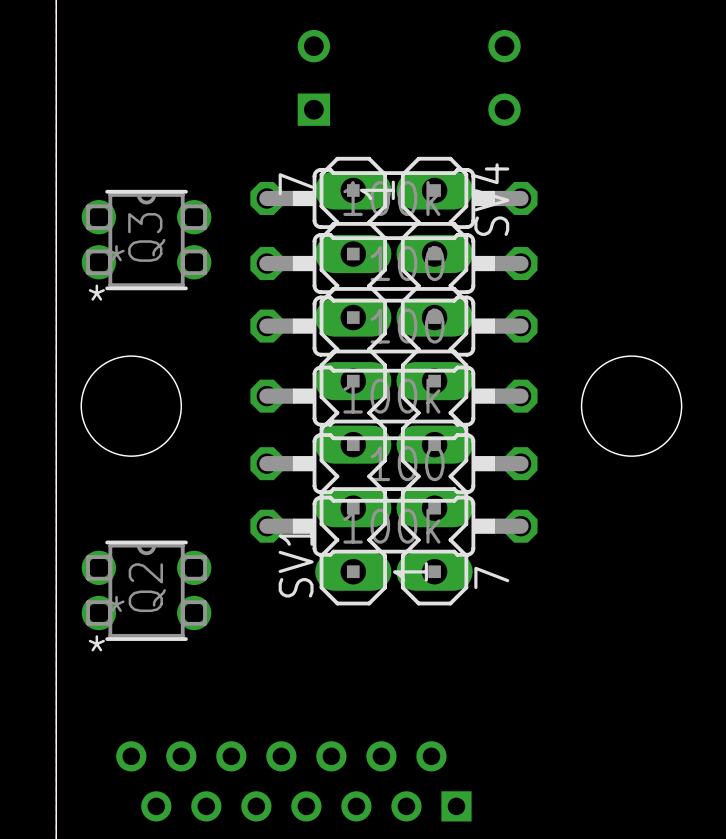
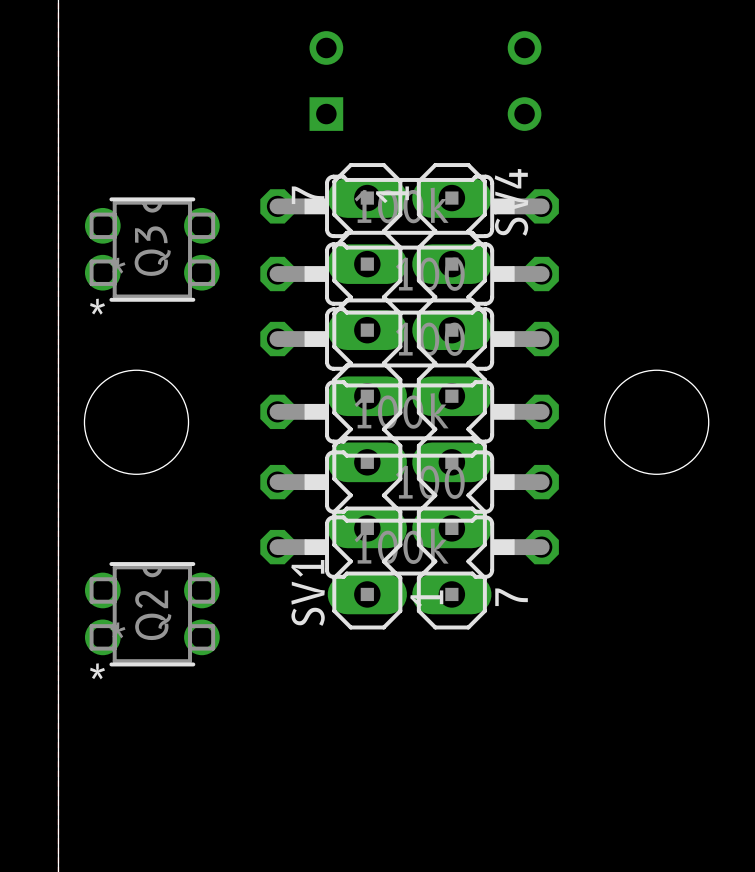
part: (293, 781) -> none

